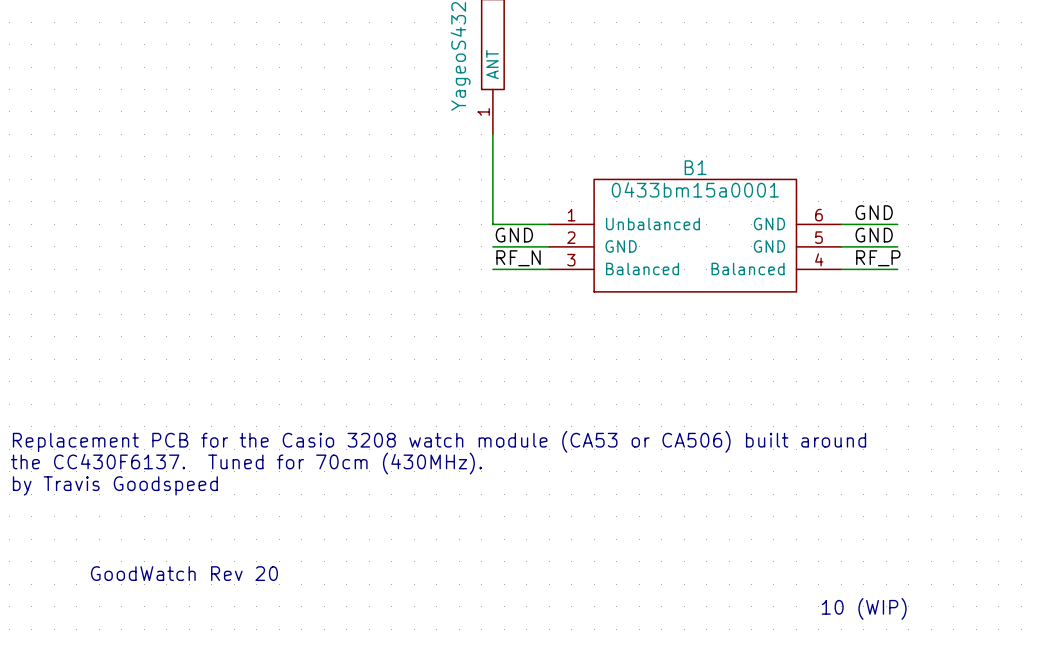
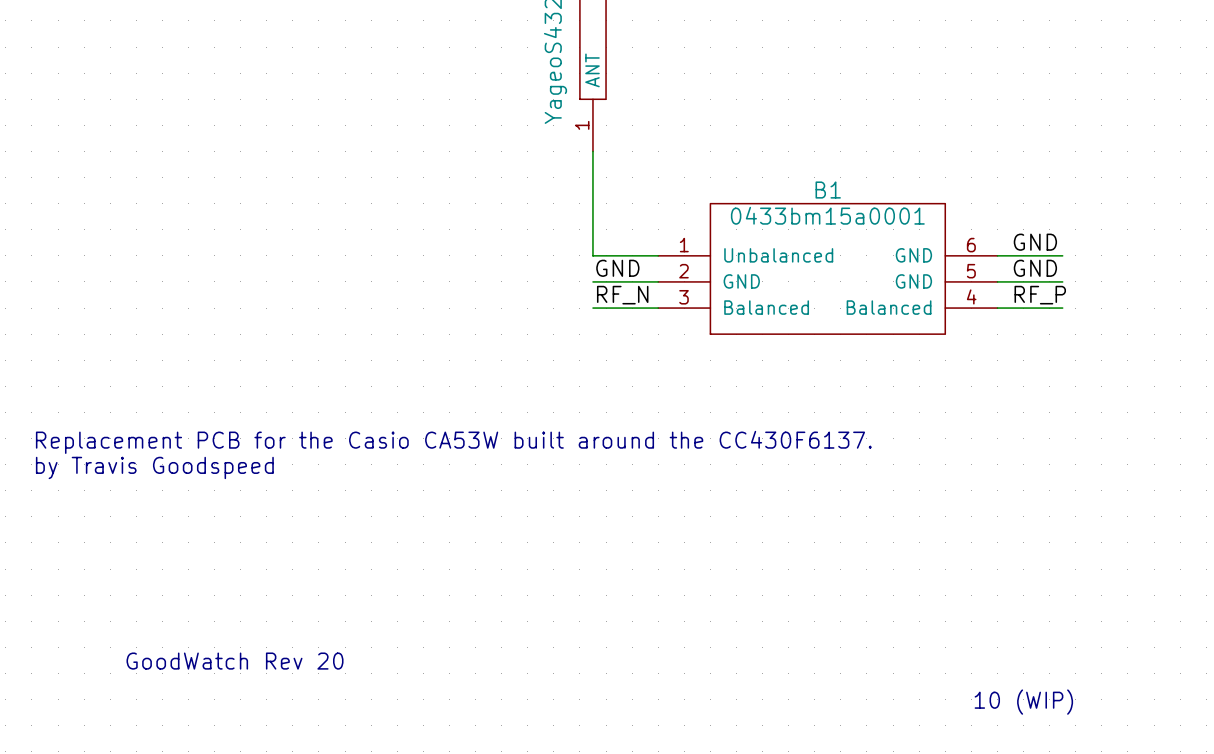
text: none -> Replacement PCB for the Casio CA53W built around the CC430F6137. (453, 442)
text: Replacement PCB for the Casio 3208 watch module (CA53 or CA506) built around (439, 441) -> none
text: the CC430F6137. Tuned for 70cm (430MHz). (246, 463) -> none
text position: by Travis Goodspeed (115, 485) -> by Travis Goodspeed (154, 467)

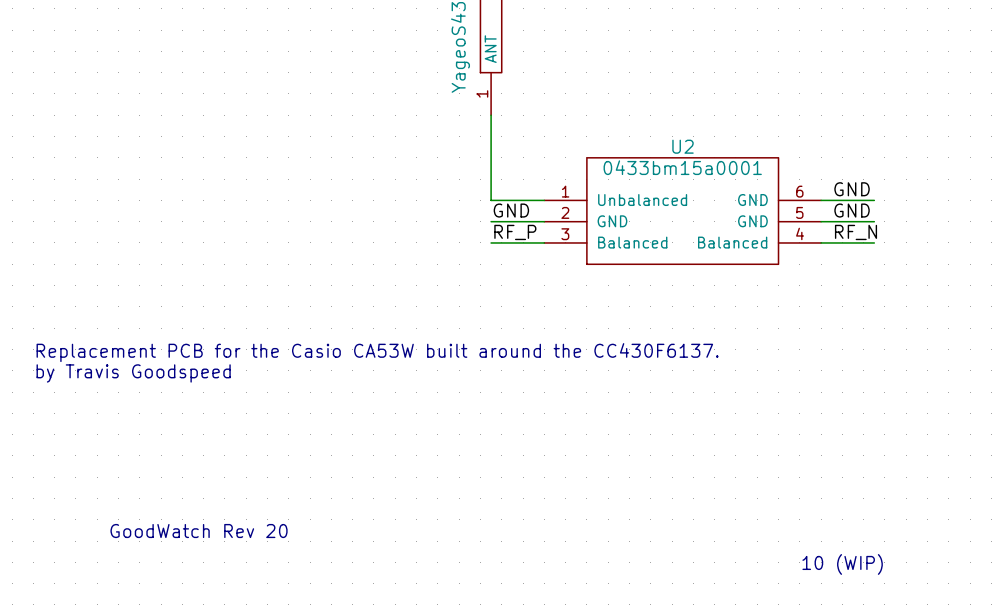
B1 name: B1 (828, 190) -> U2 (683, 146)
label: RF_N (622, 295) -> RF_P (515, 232)
label: RF_P (1040, 295) -> RF_N (856, 232)

